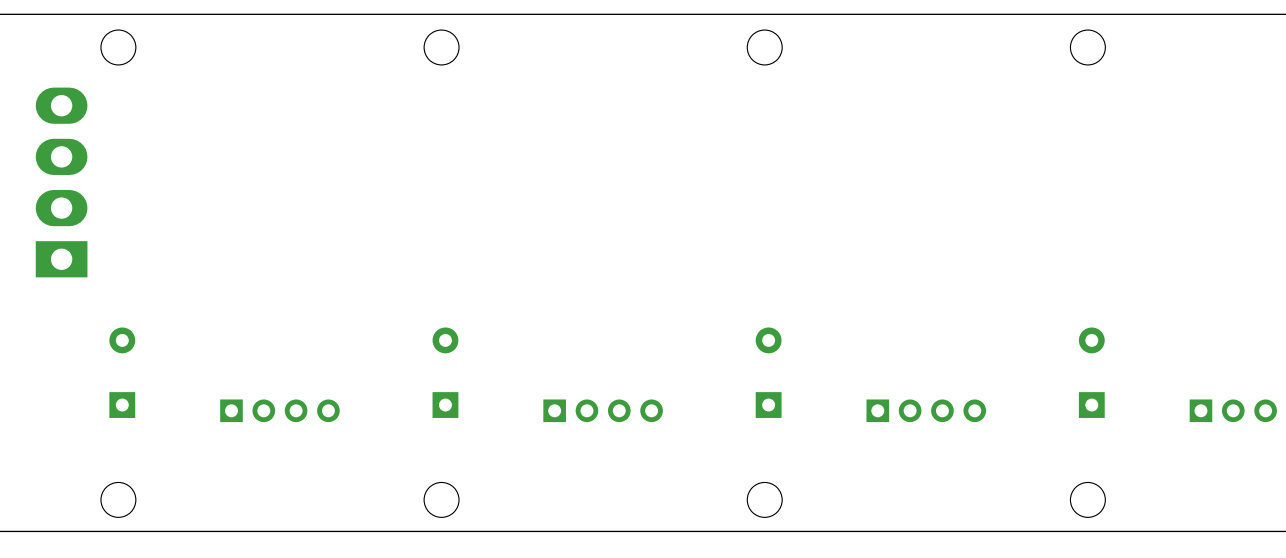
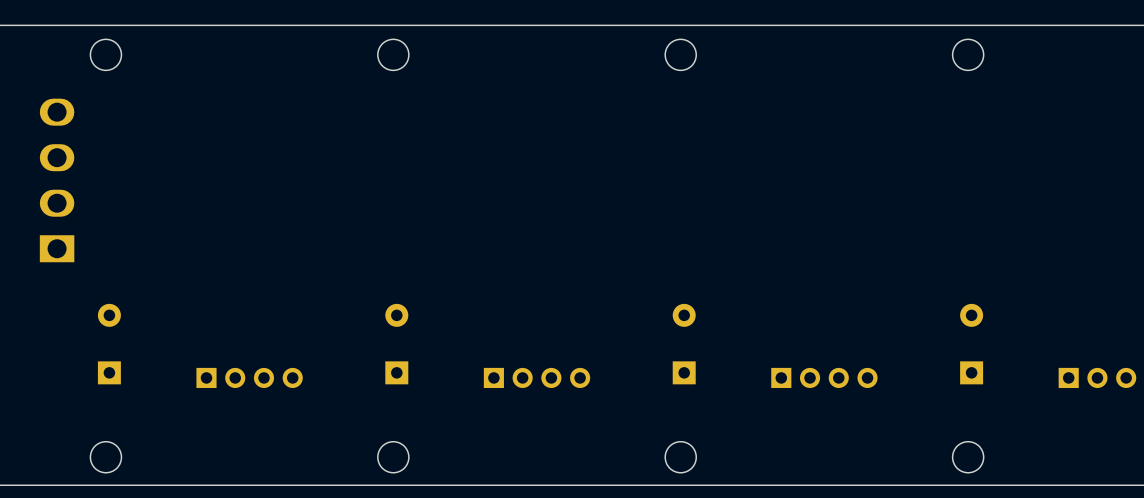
part footprint: [35, 87, 88, 278] -> [39, 98, 75, 263]

